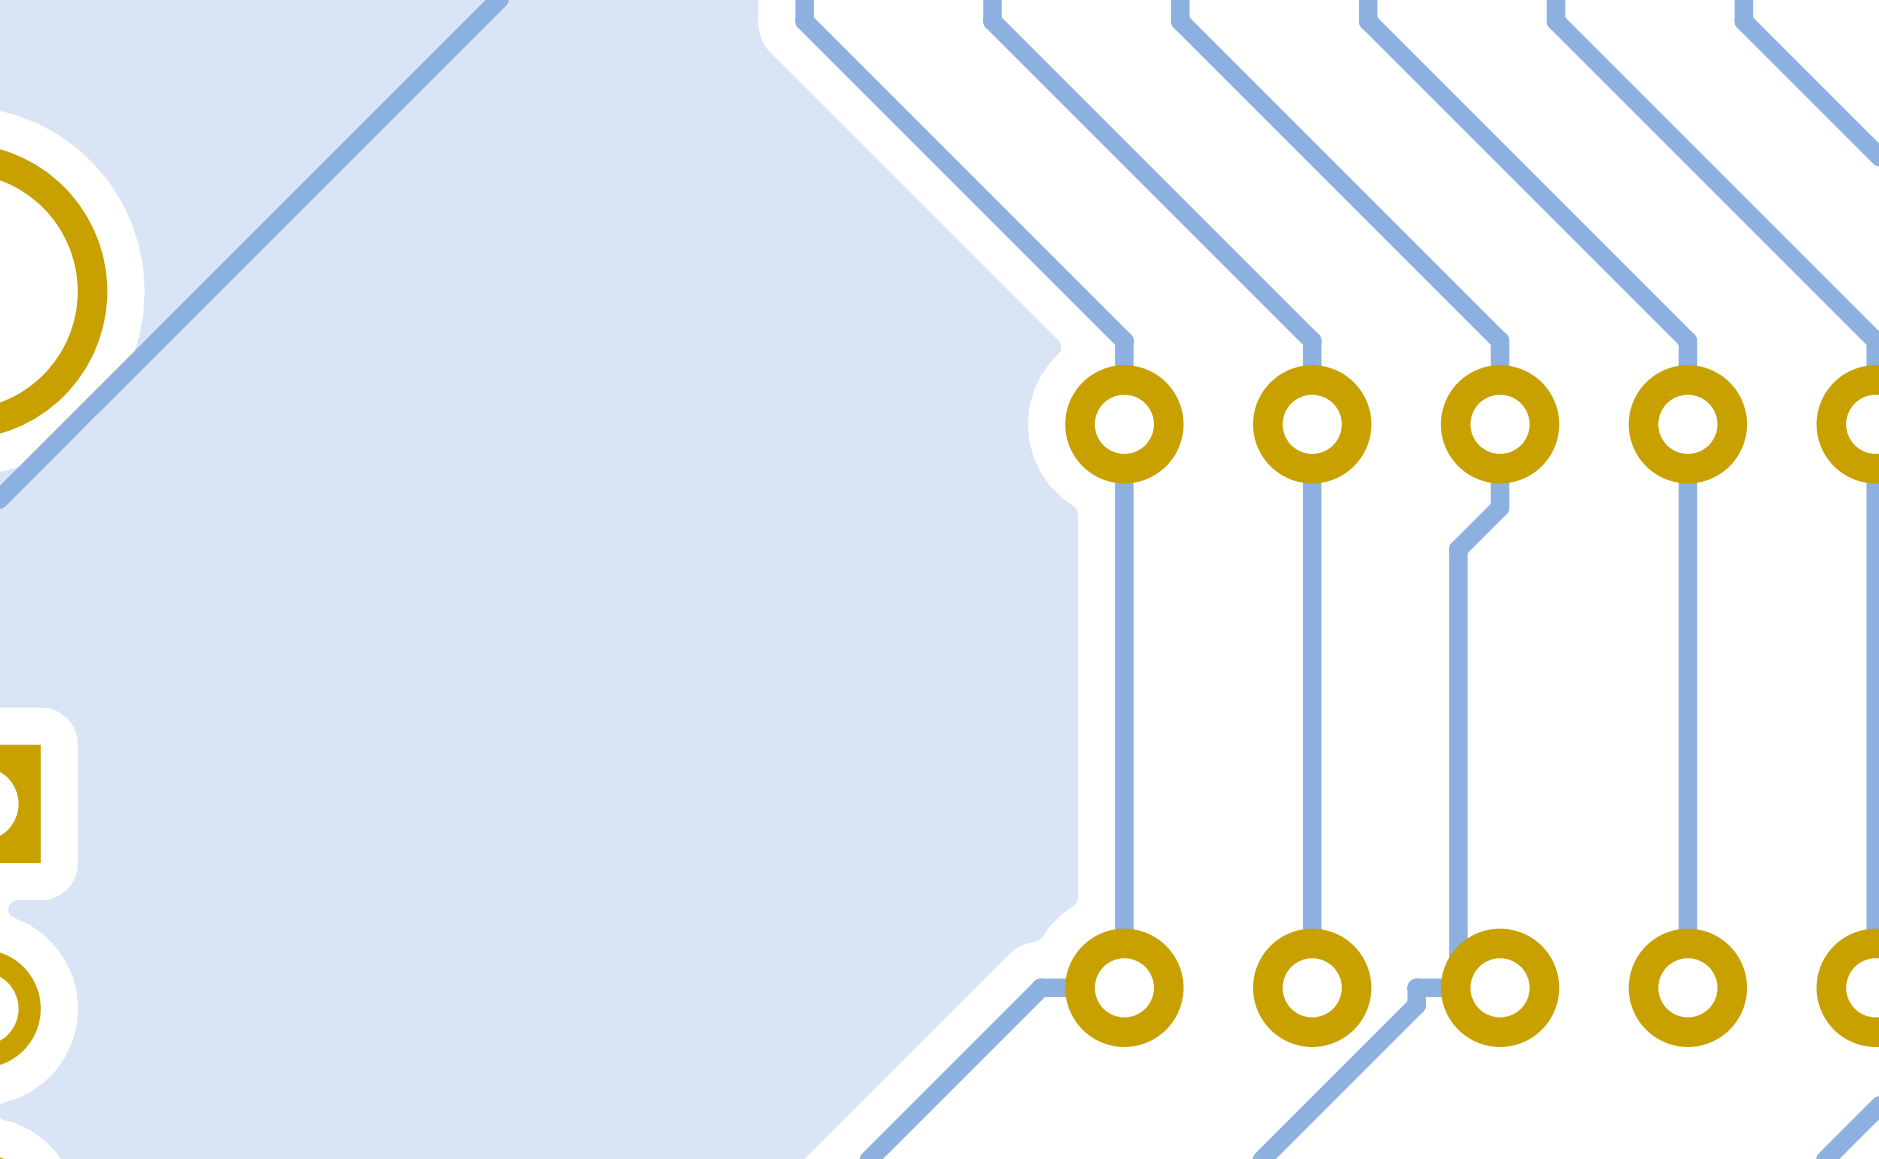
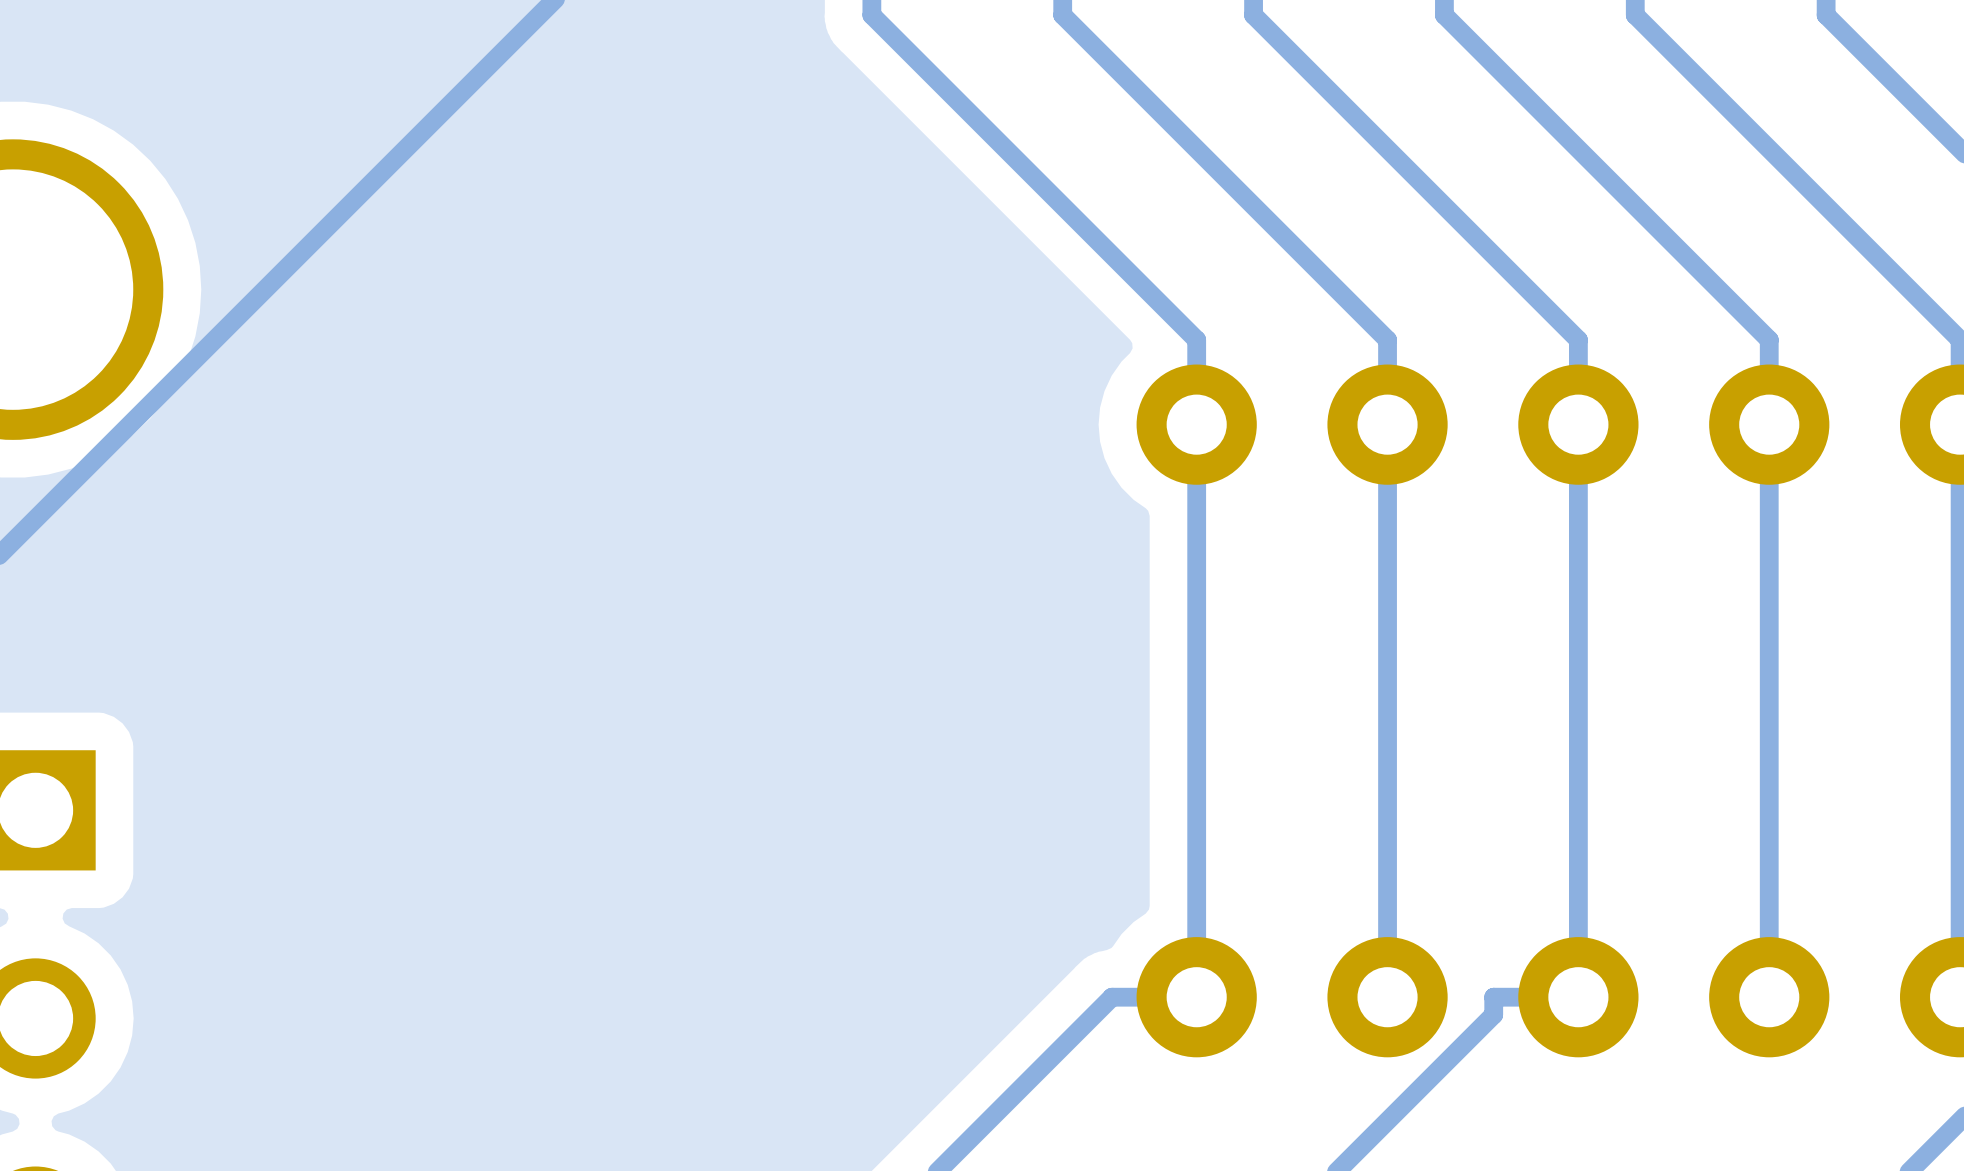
track: (1500, 507) (1458, 549) (1458, 987) -> (1578, 509) (1578, 997)

